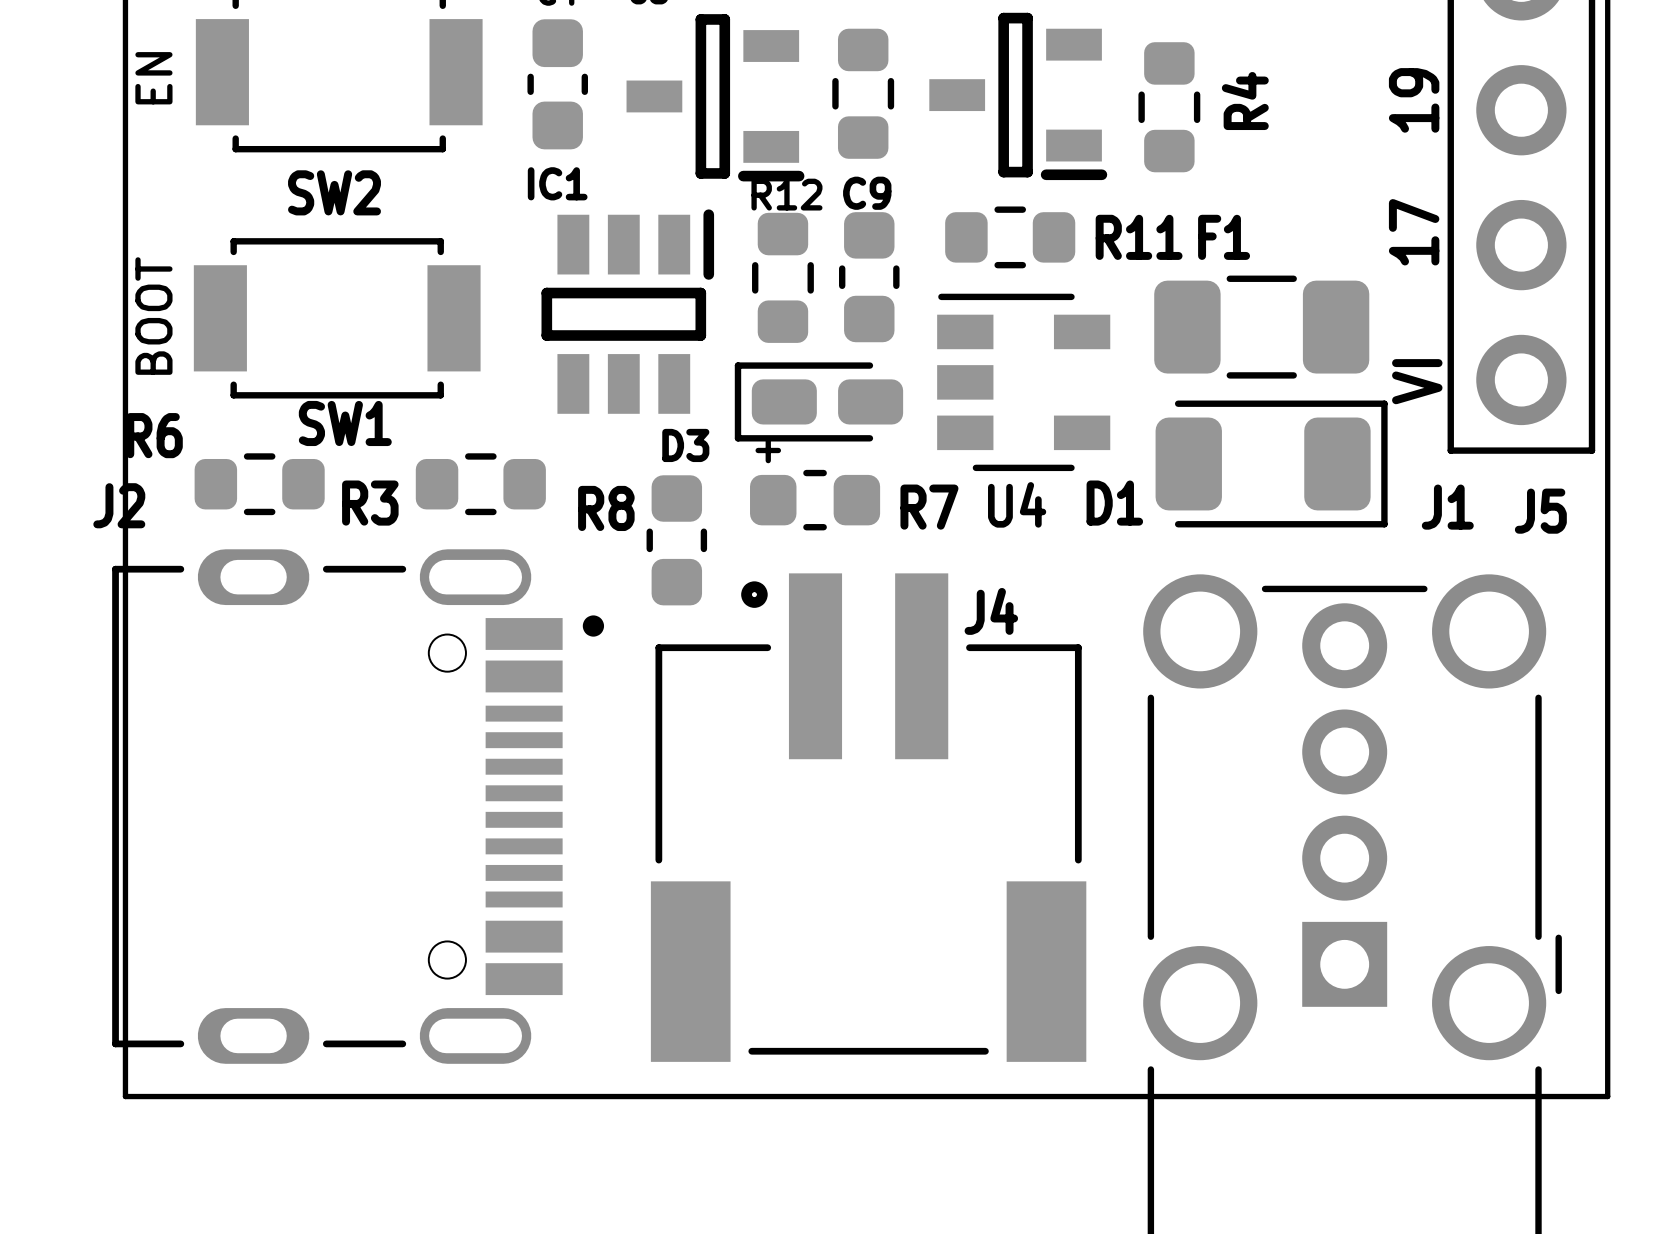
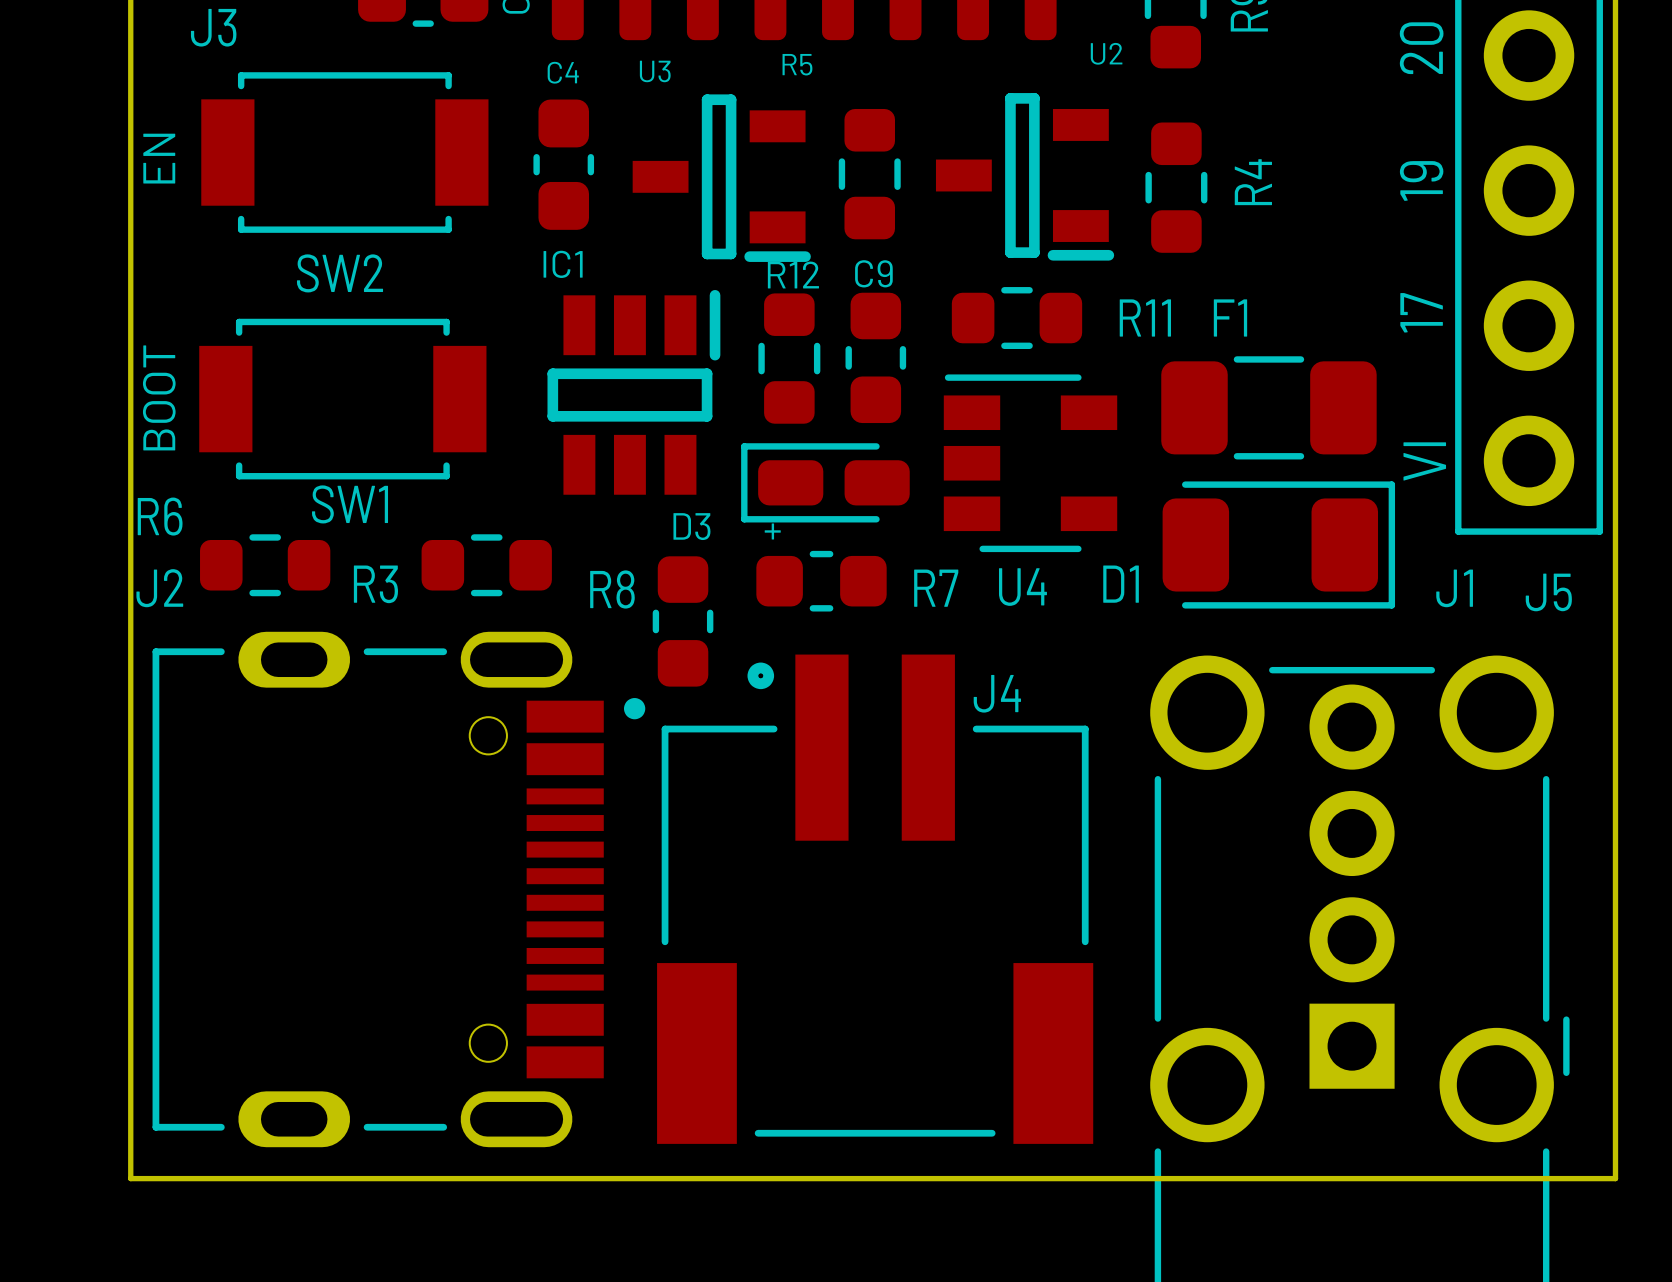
J2 position: (358, 806) -> (398, 889)

